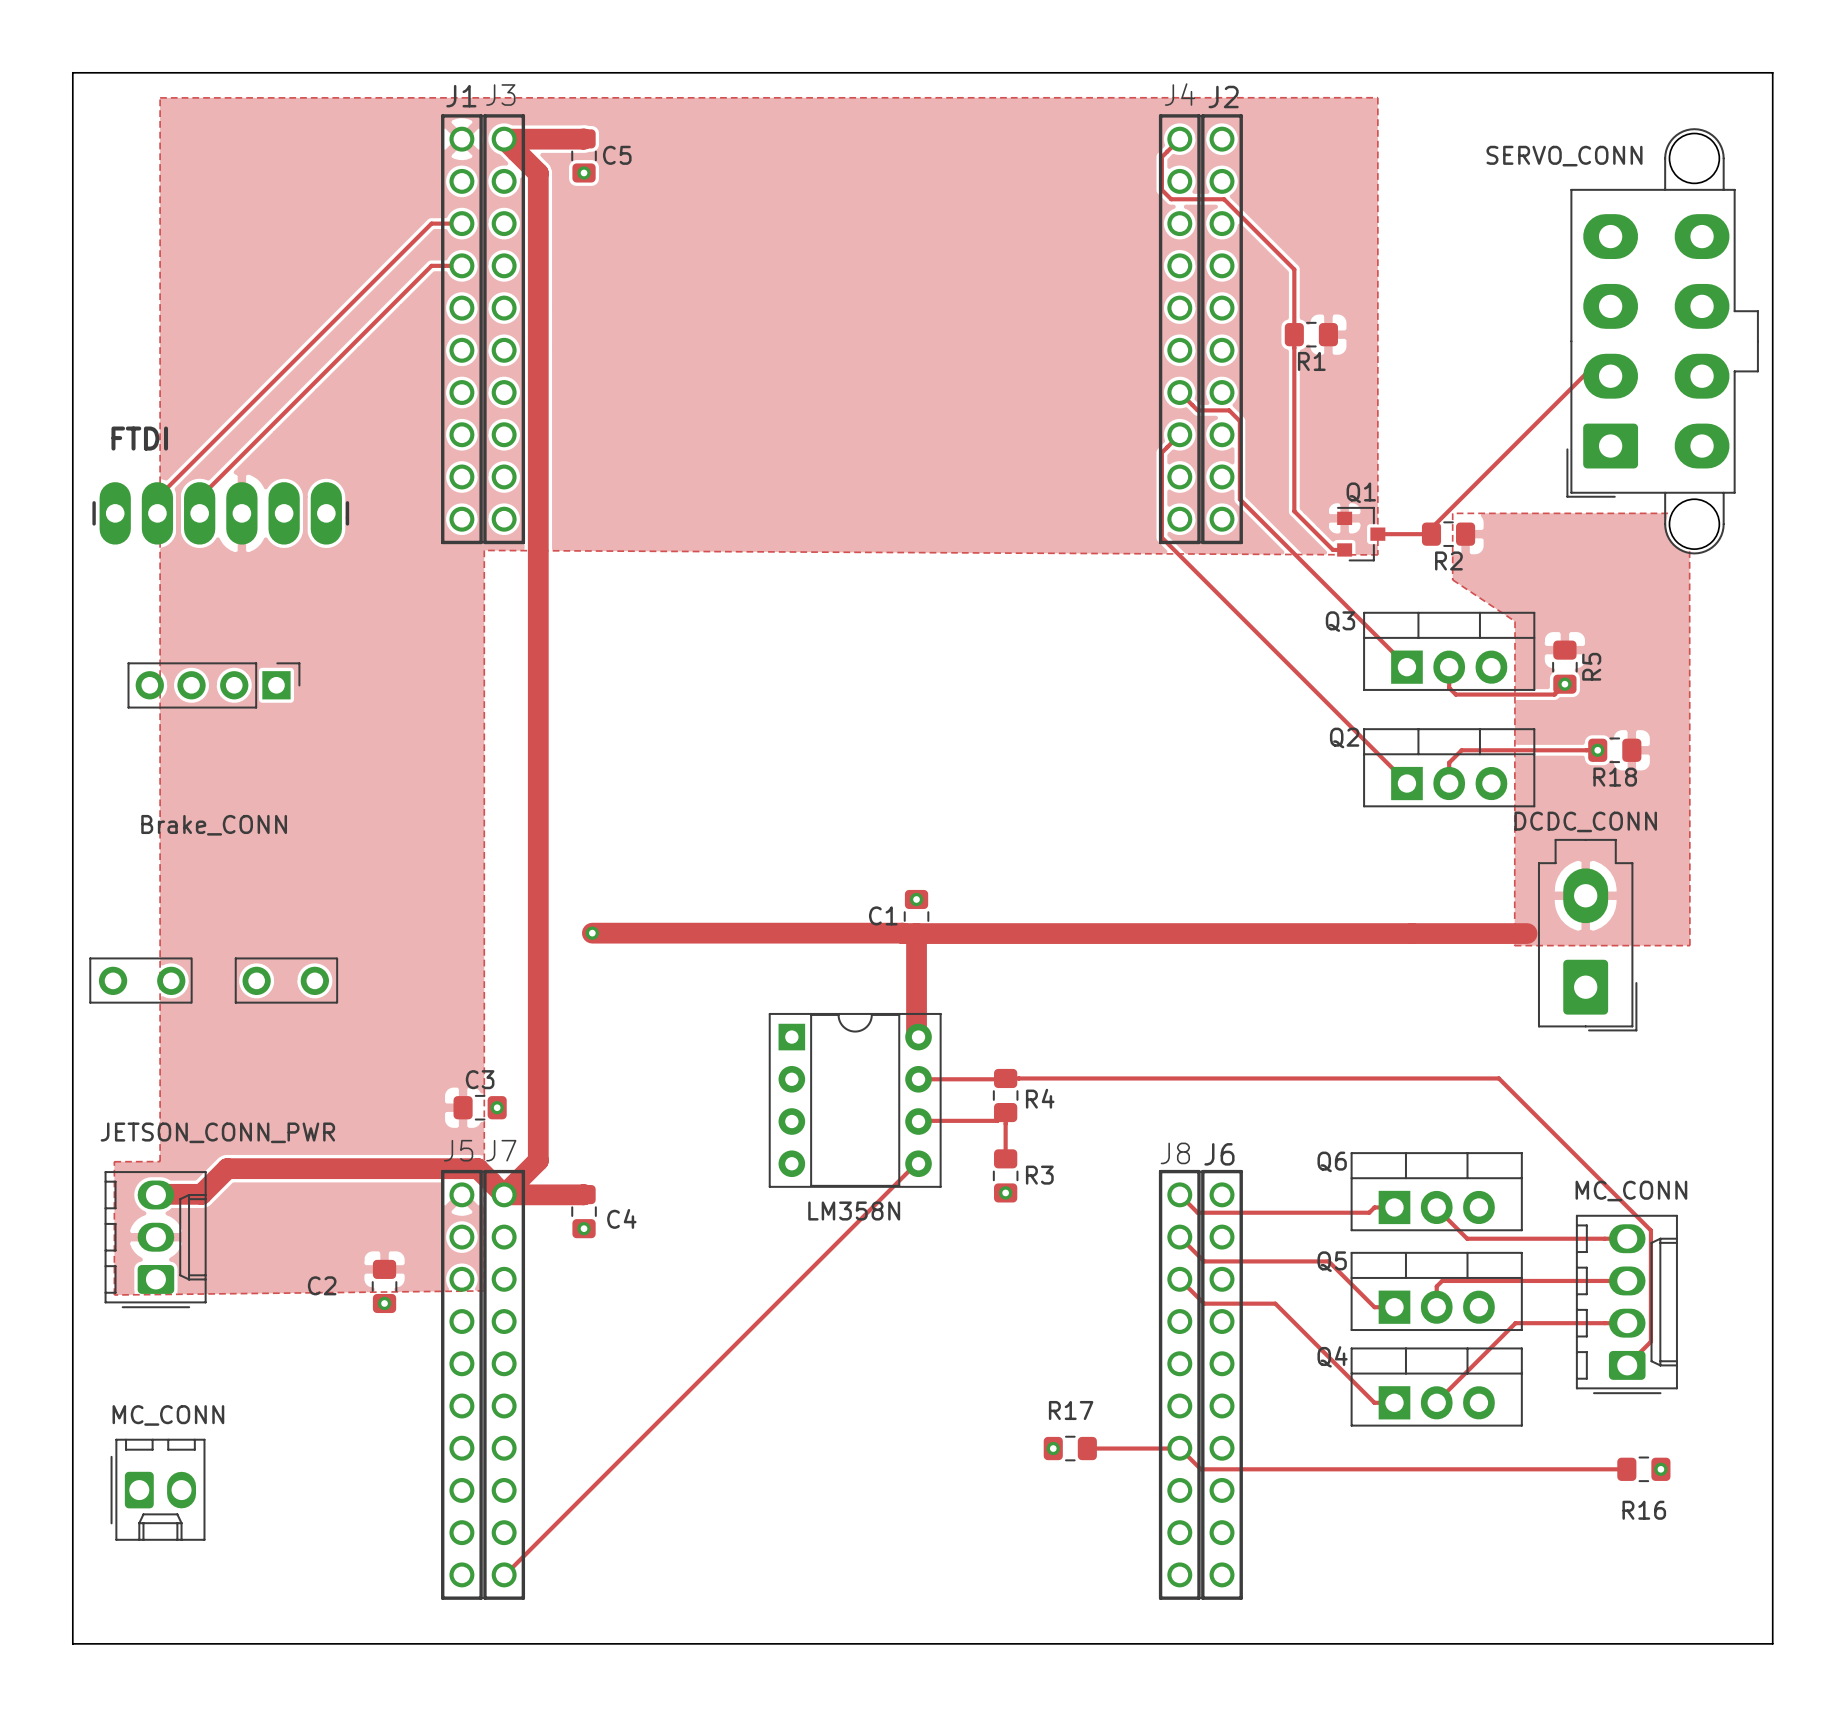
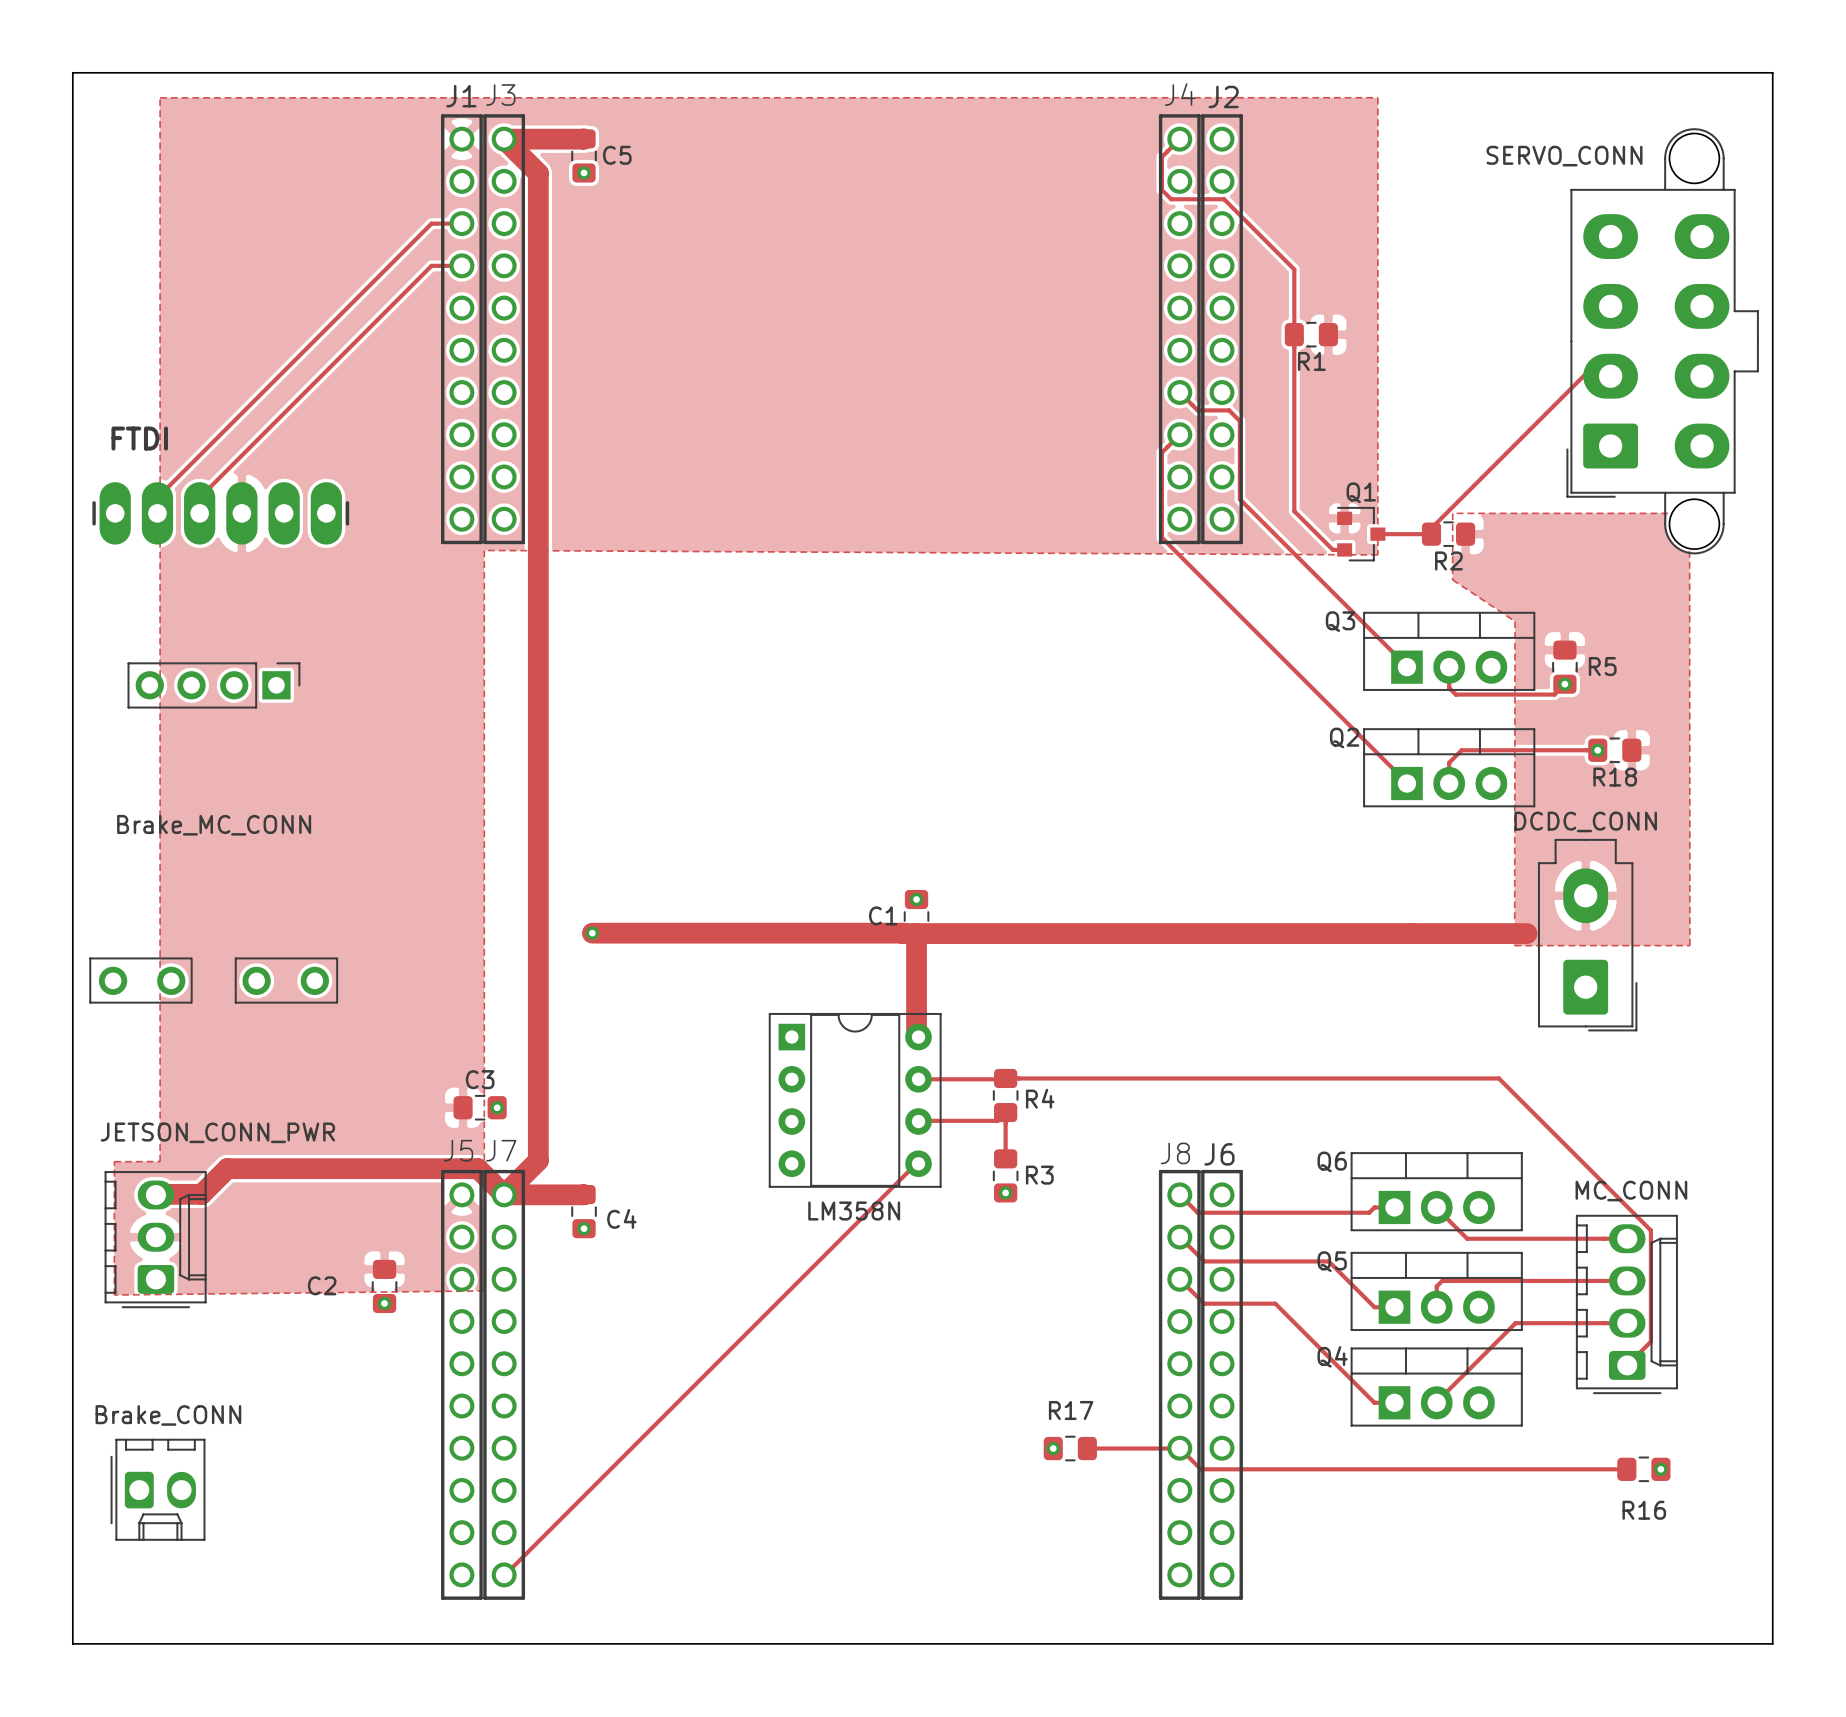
R5 name rotation: 0° (1591, 666) -> 90° clockwise (1602, 666)
part value: Brake_CONN (214, 825) -> Brake_MC_CONN (214, 825)
part value: MC_CONN (168, 1415) -> Brake_CONN (168, 1415)

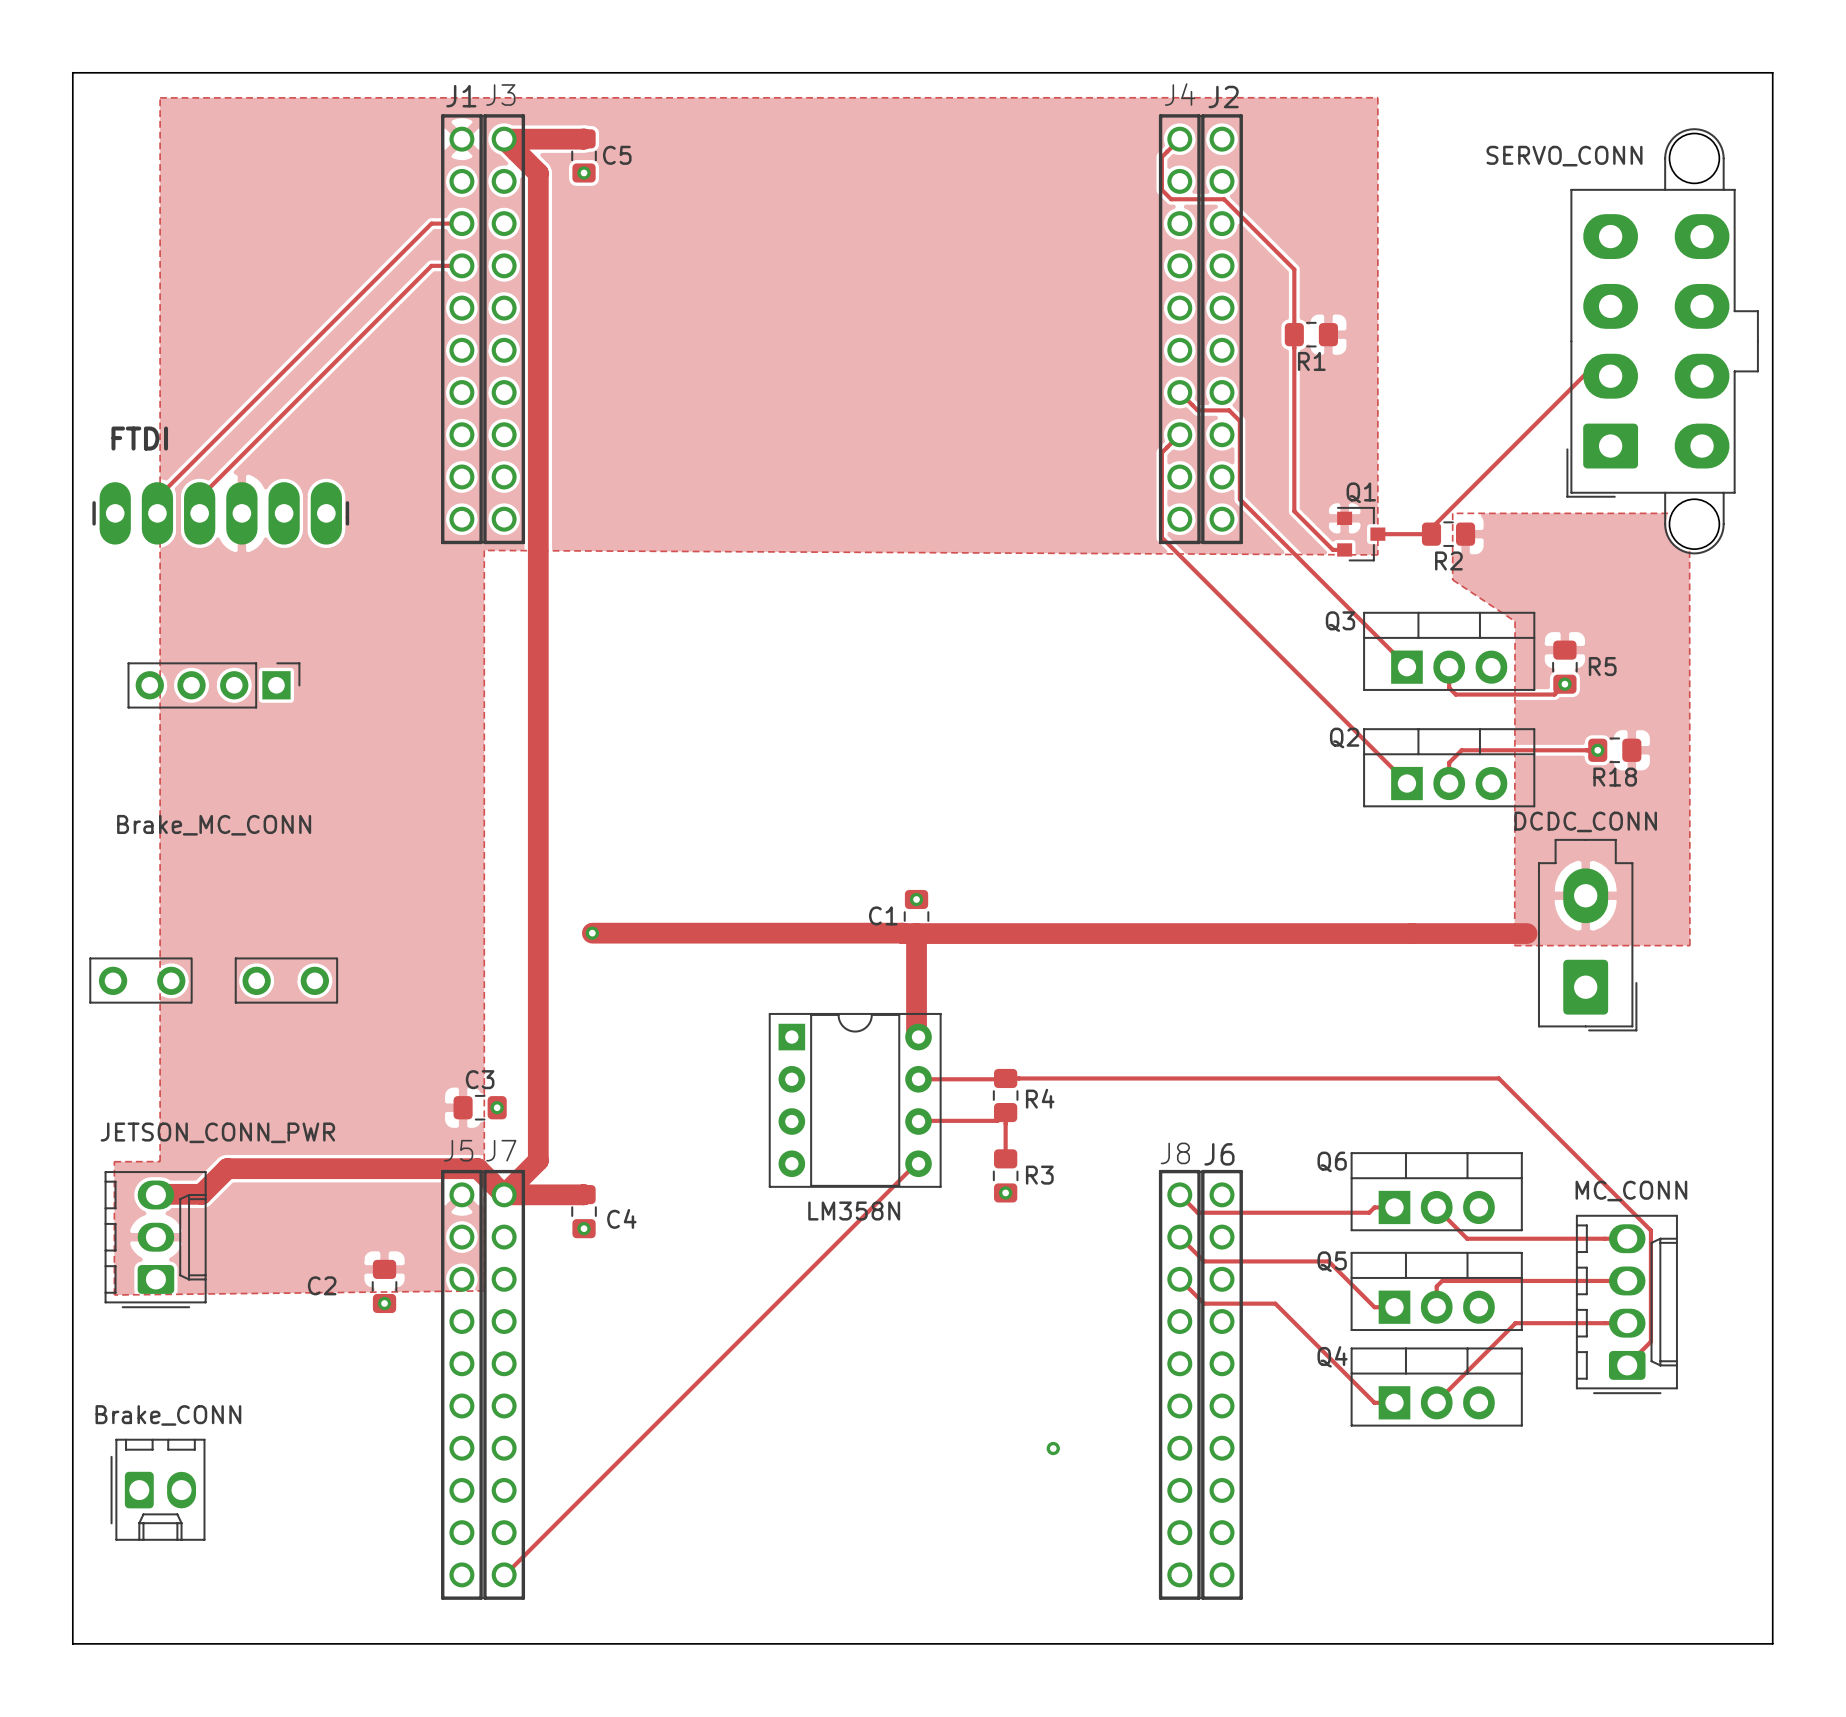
R17: (1070, 1448) -> none
track: (1087, 1448) (1179, 1448) (1200, 1469) (1626, 1469) -> none
R16: (1643, 1469) -> none
via: (1660, 1469) -> none

